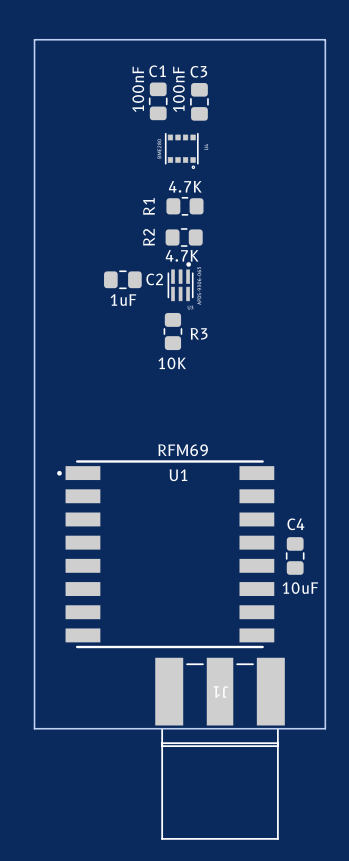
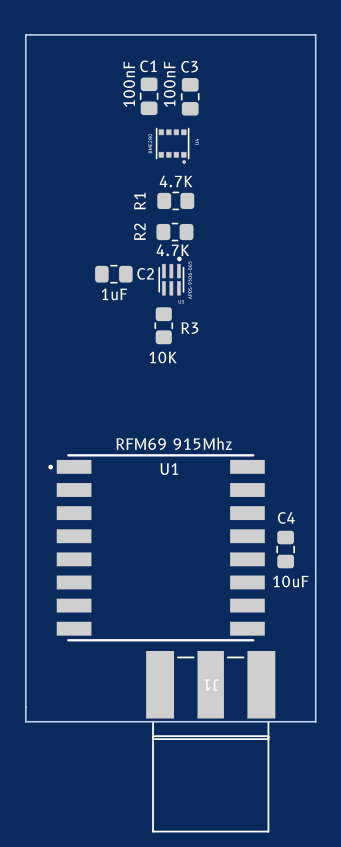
U1 value: RFM69 (183, 450) -> RFM69 915Mhz (174, 443)

